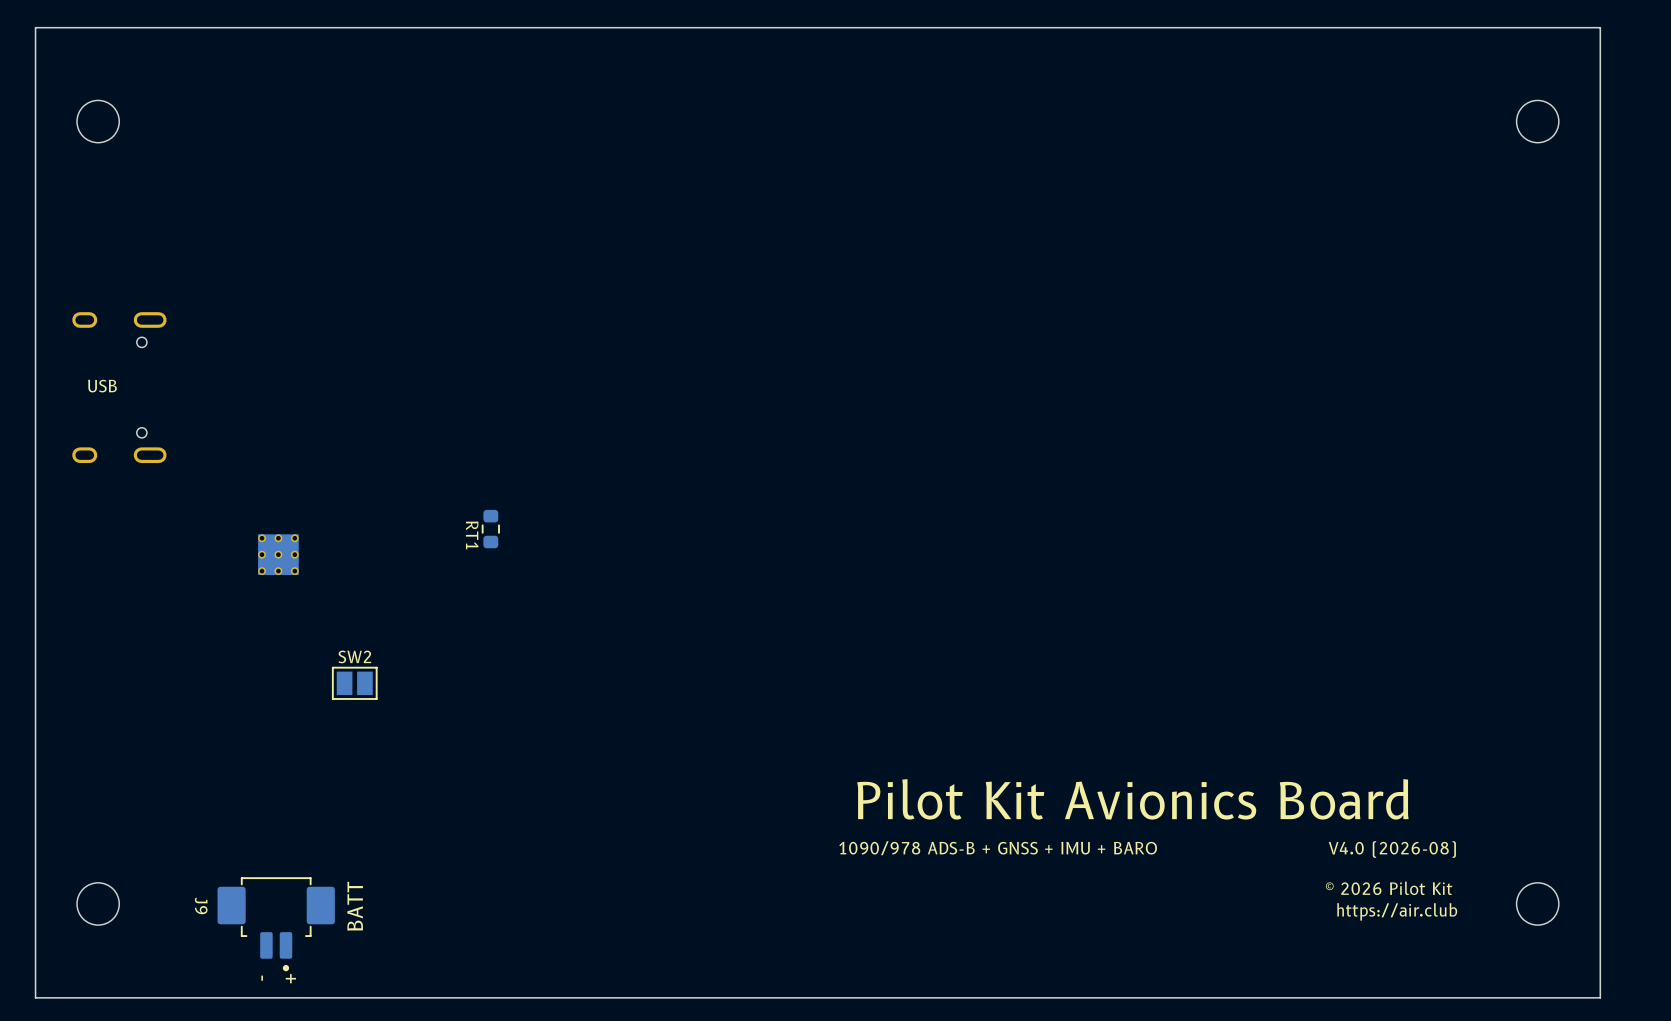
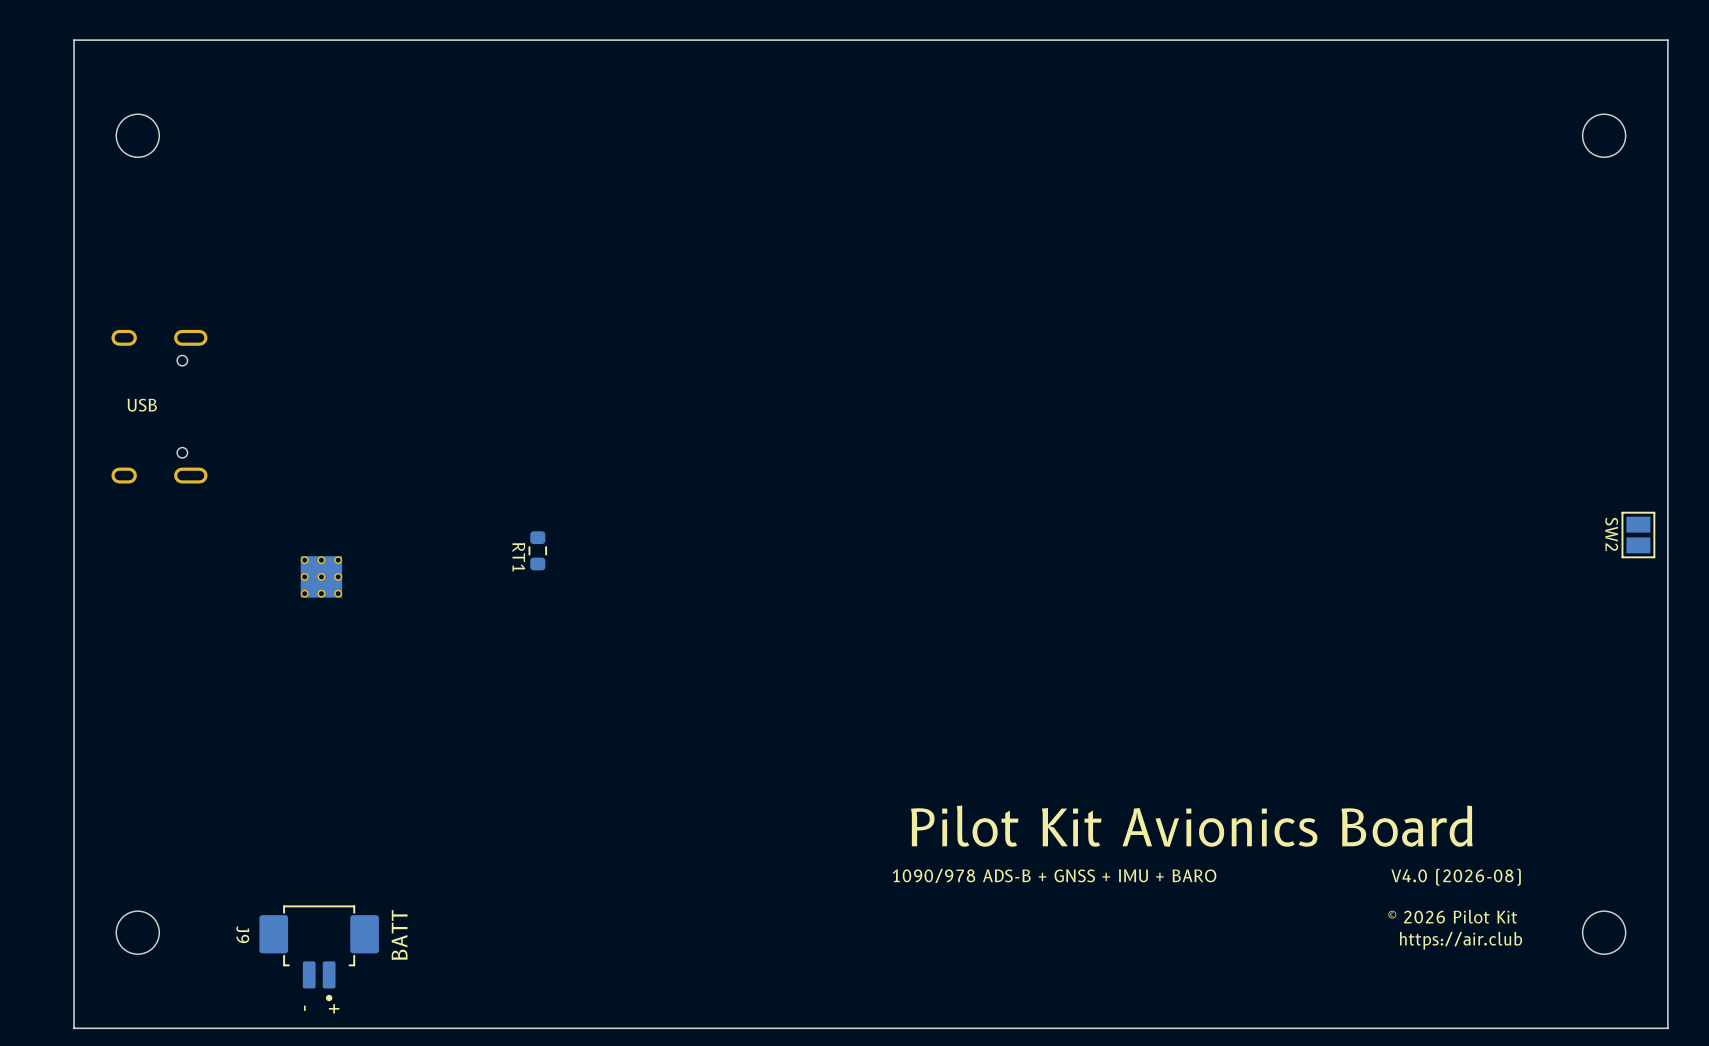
SW2 name position: SW2 (354, 656) -> SW2 (1611, 534)
SW2 rotation: 0° (354, 683) -> 90° clockwise (1638, 535)
SW2 position: (354, 683) -> (1638, 535)

